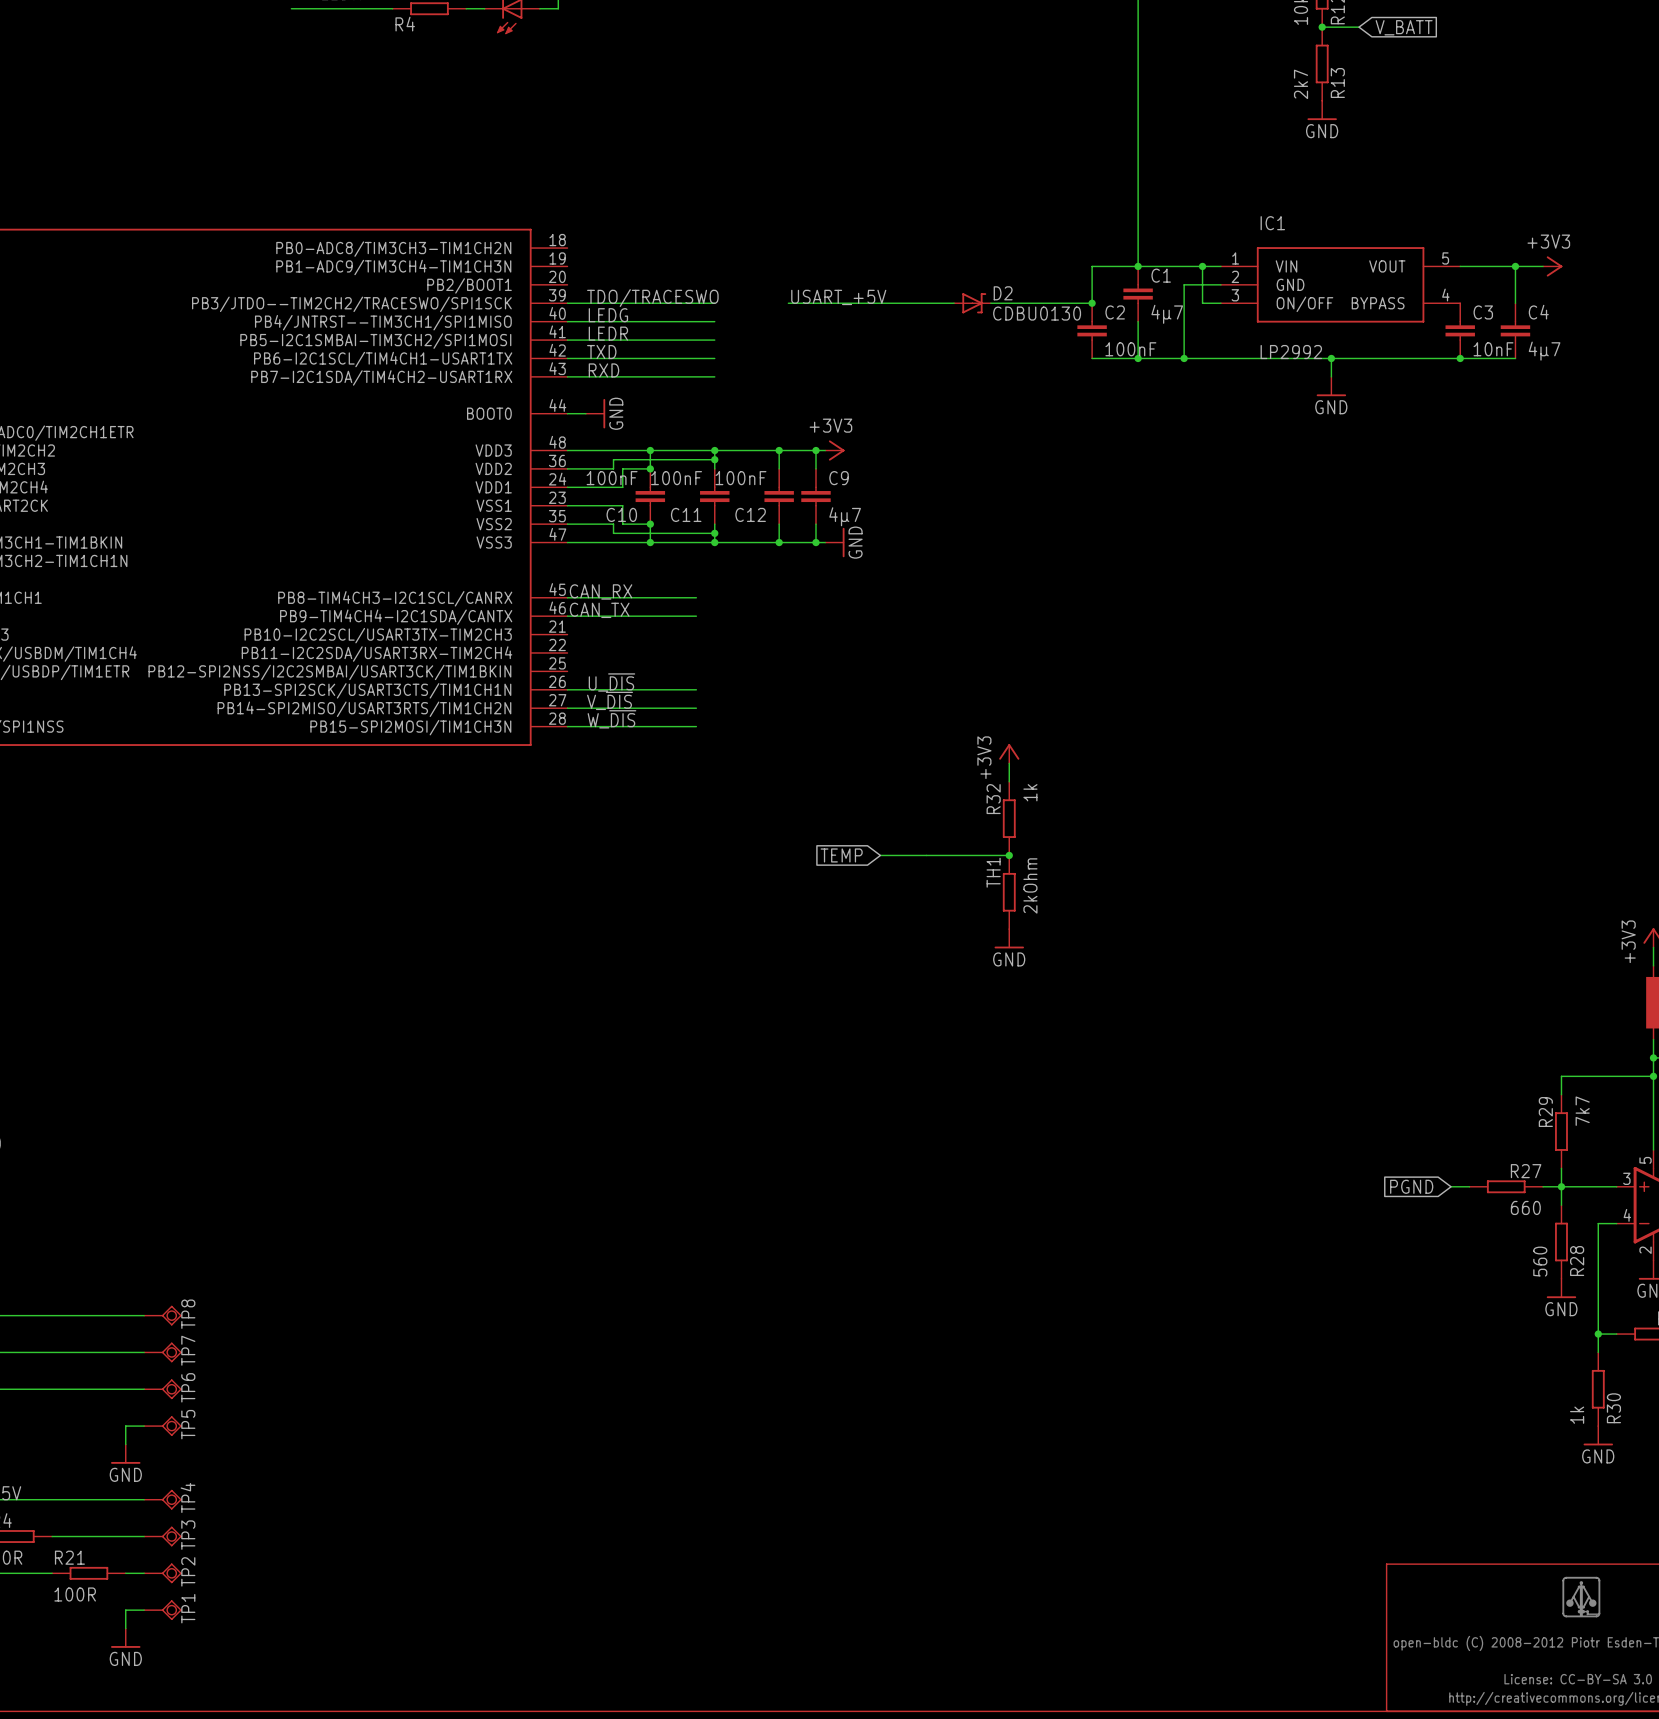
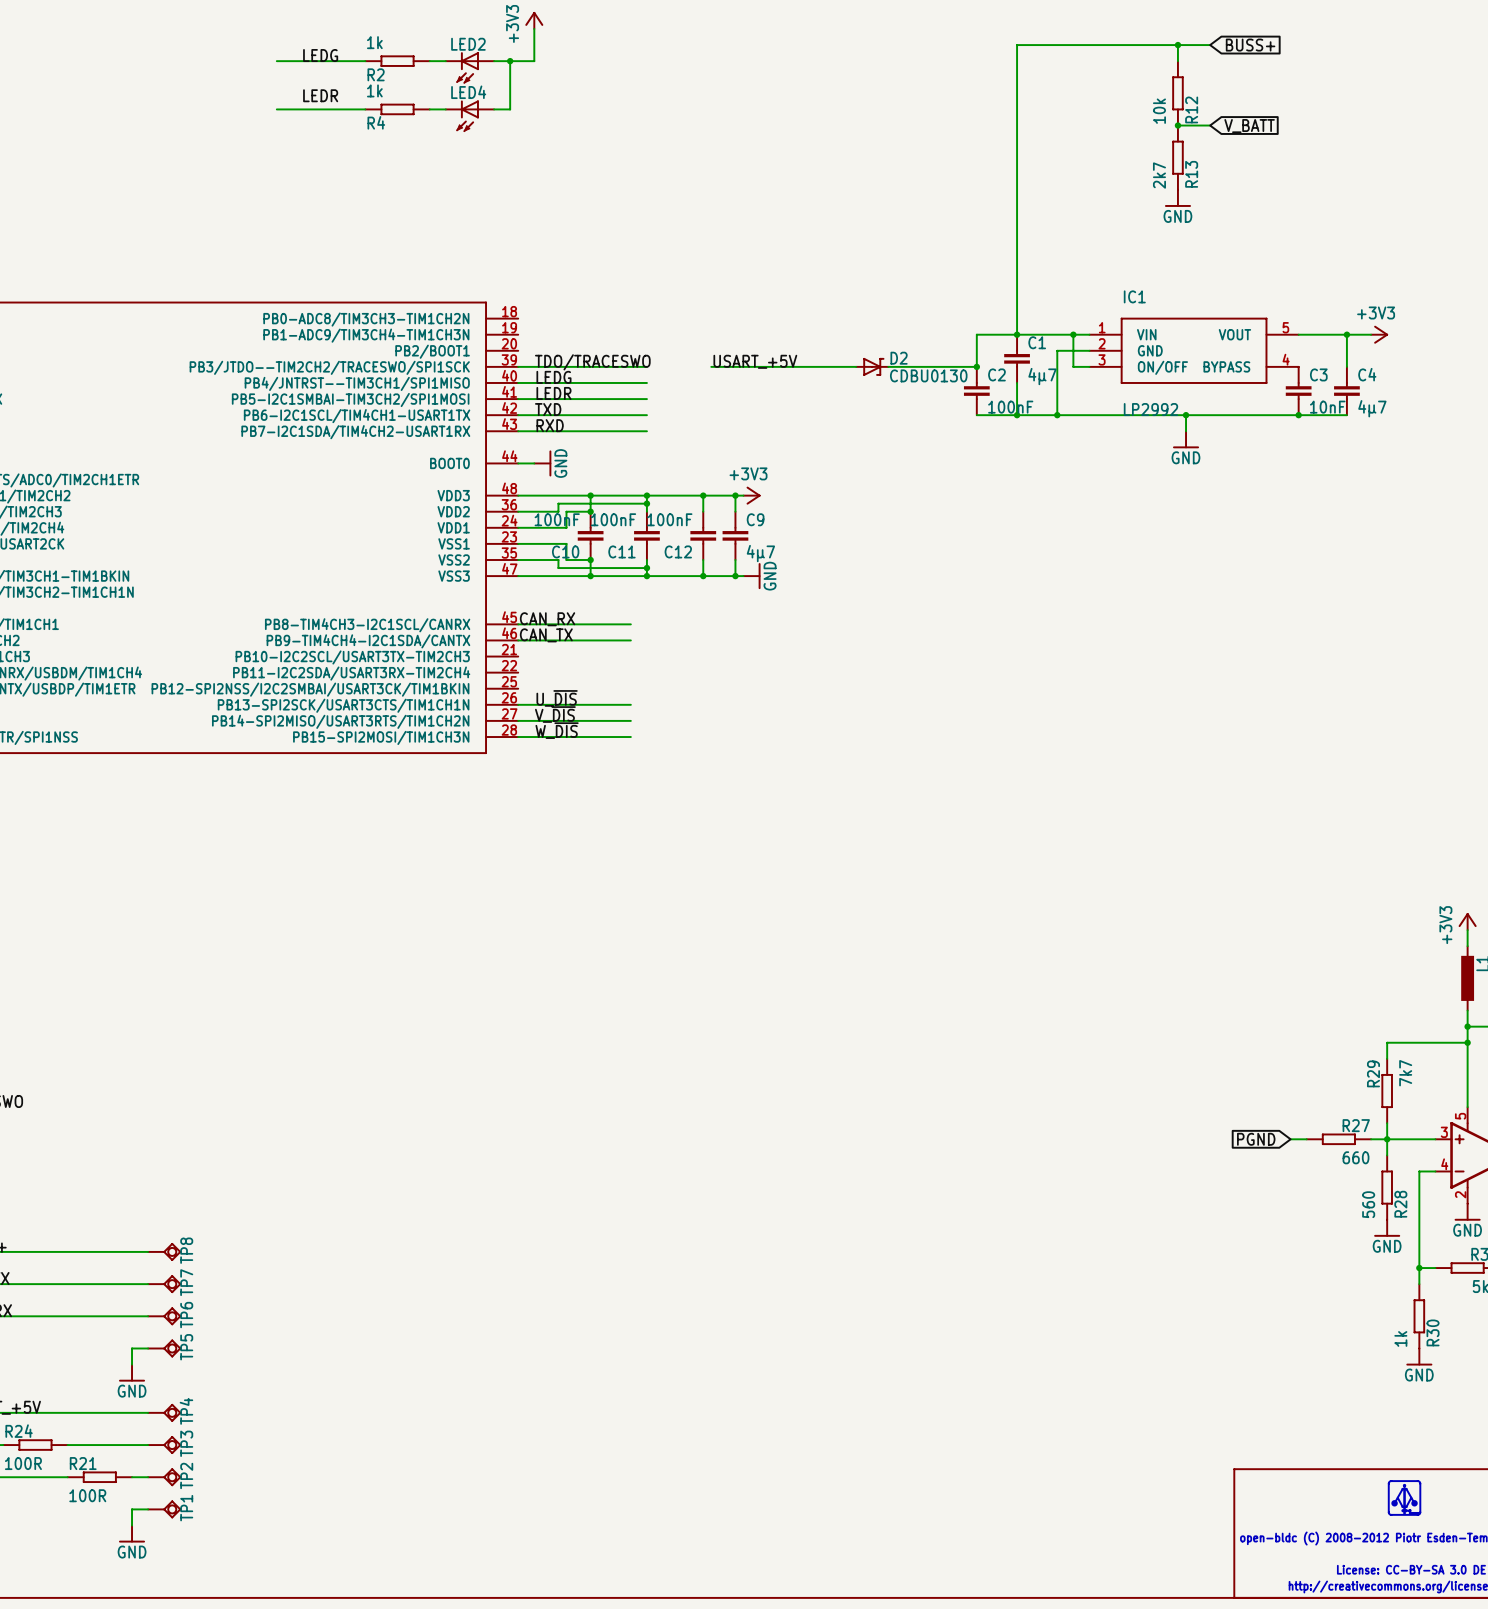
power symbol: +3V3 (1009, 753) -> none
wire: (1009, 763) (1009, 781) -> none
R32: 1k (1009, 818) -> none
global label: TEMP (841, 855) -> none
wire: (880, 855) (1009, 855) -> none
junction: (1009, 855) -> none
TH1: 2kOhm (1009, 892) -> none
power symbol: GND (1009, 938) -> none

